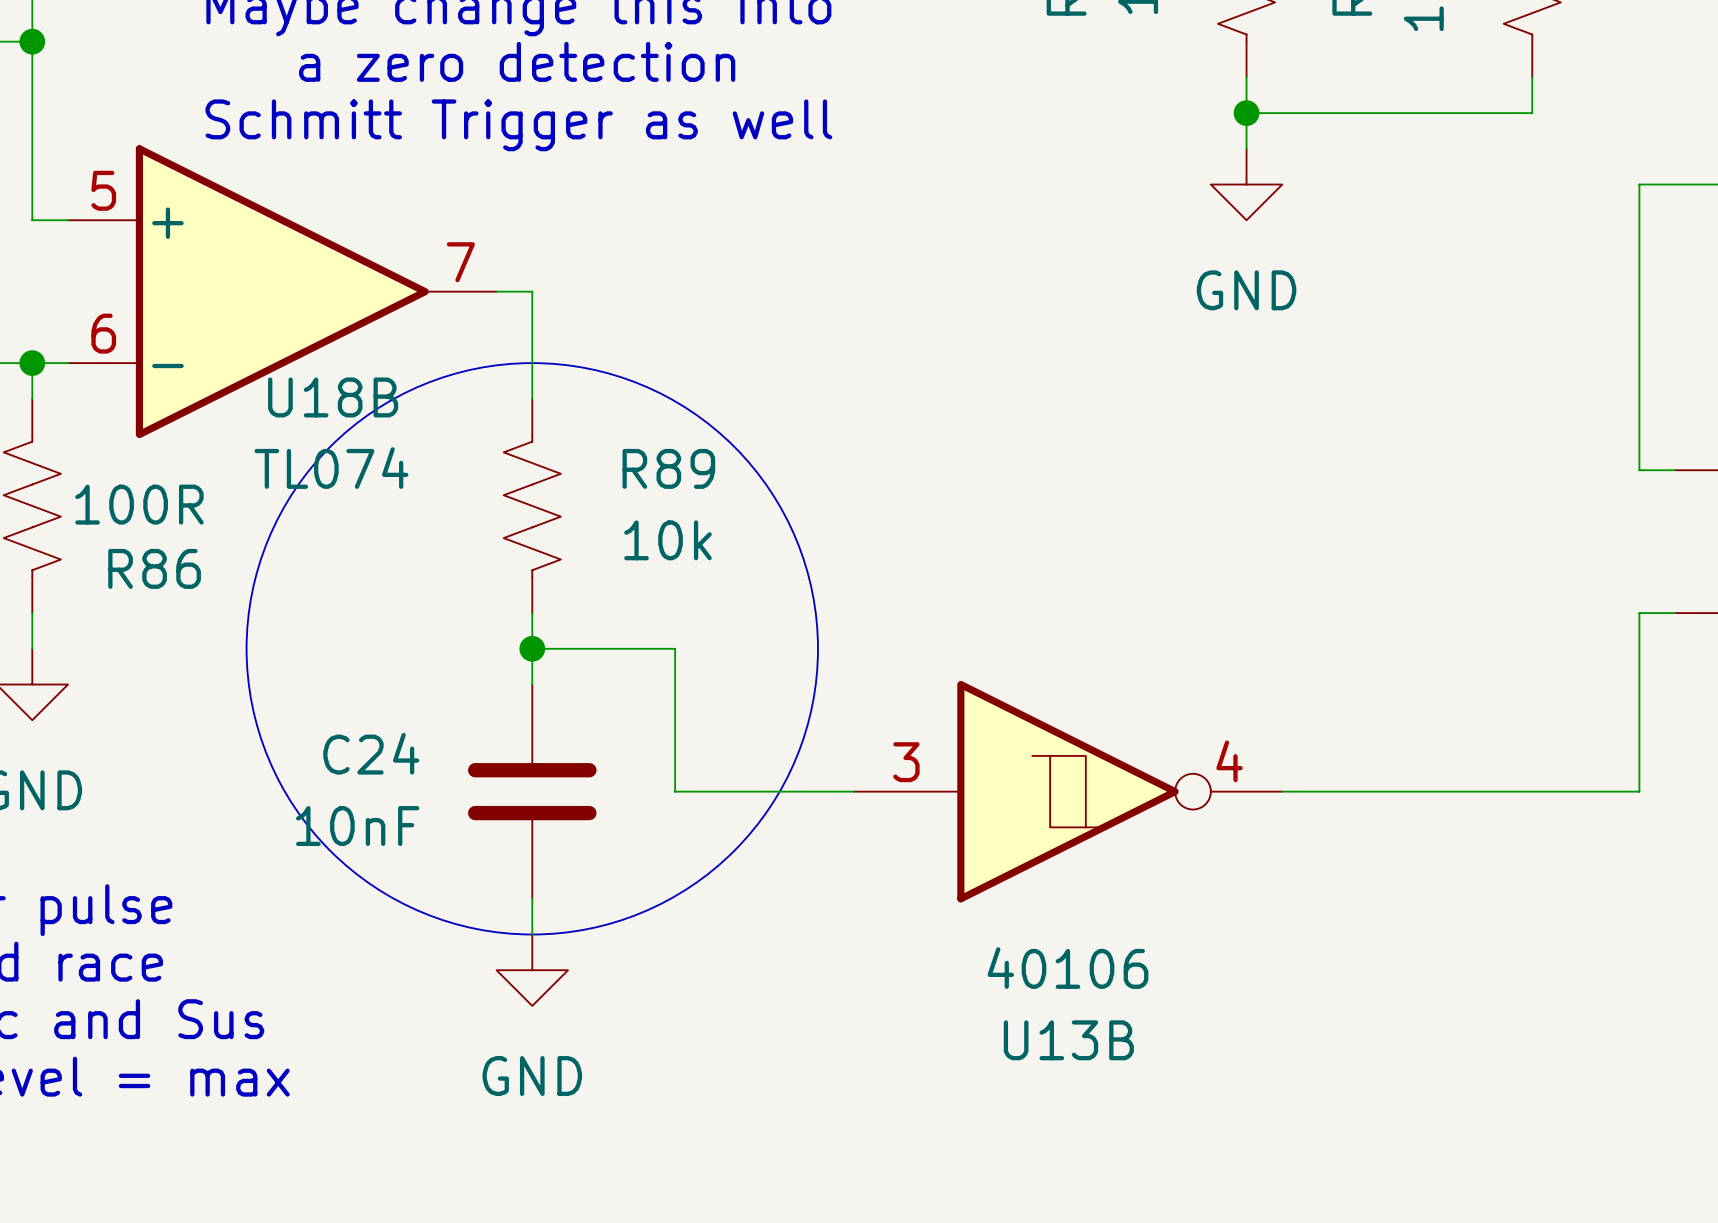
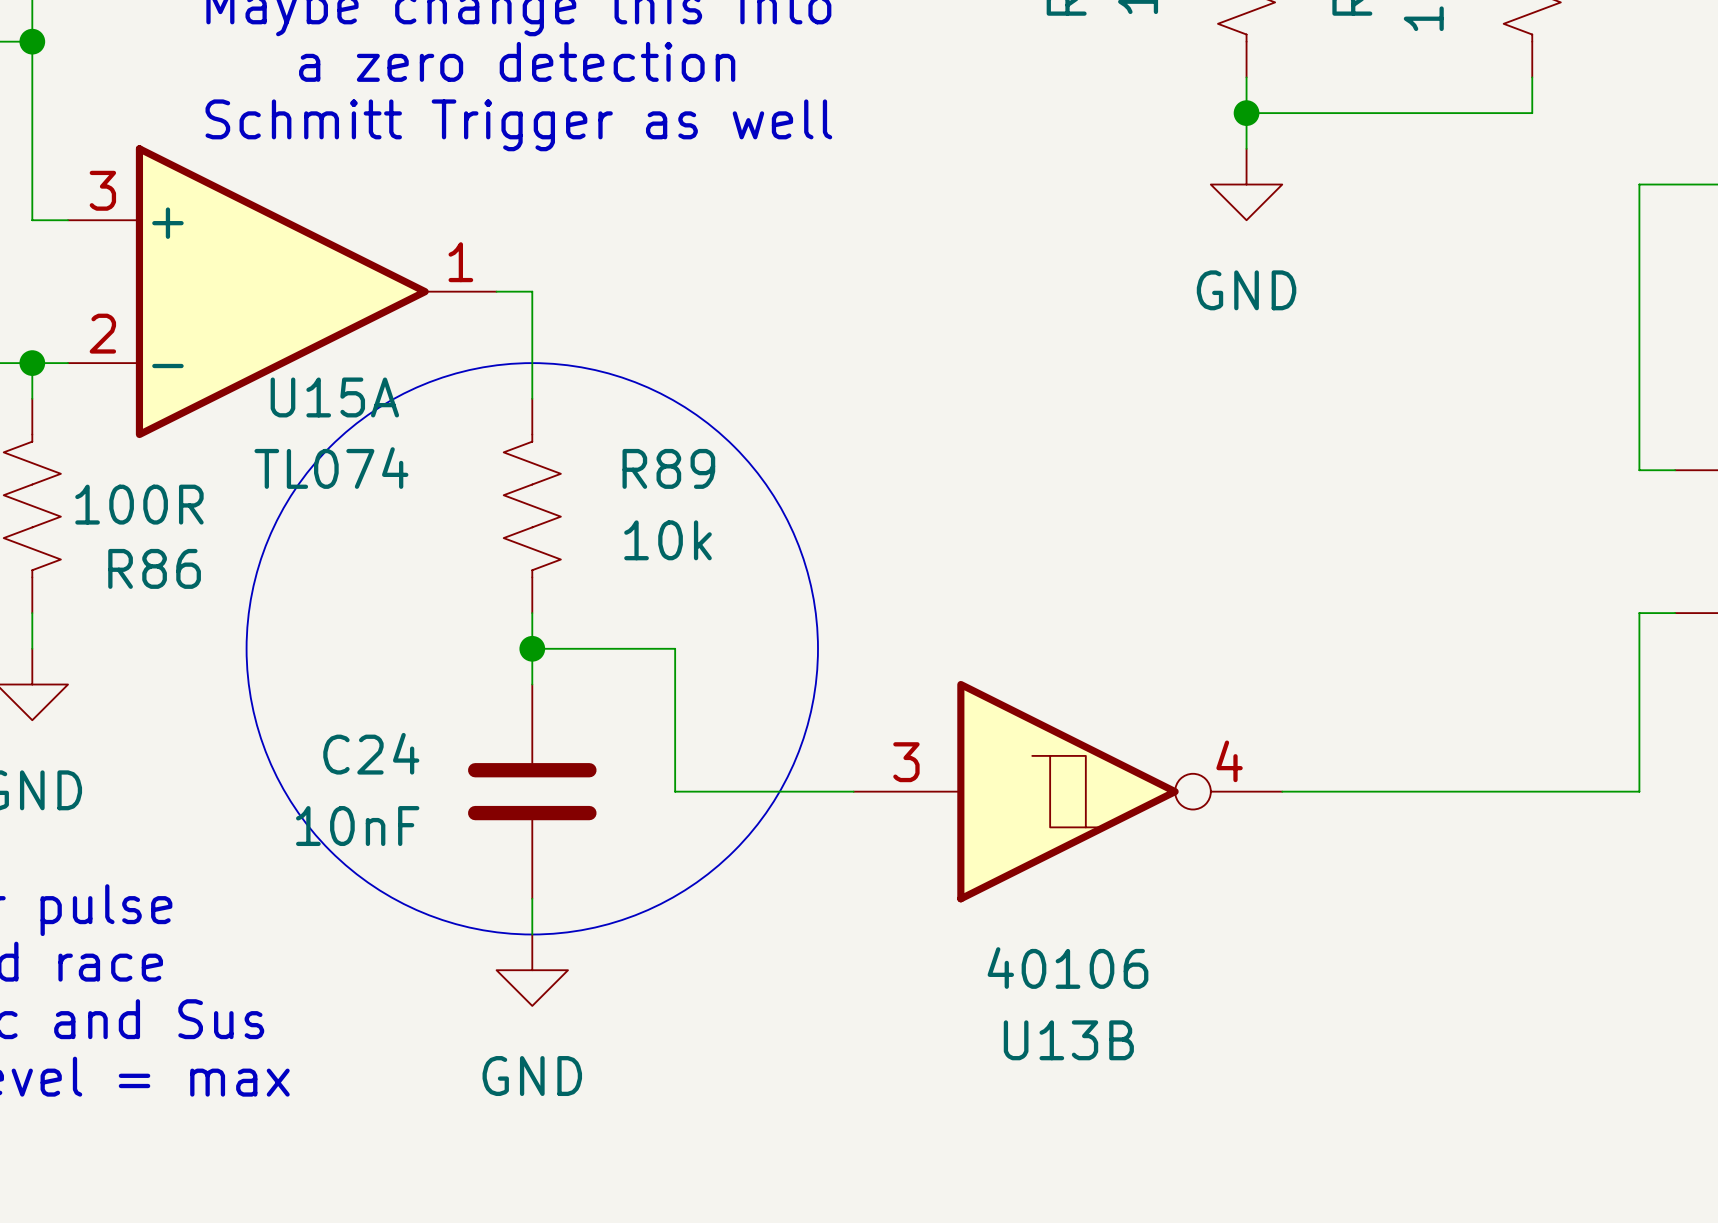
U18B pin number: 5 (103, 190) -> 3 (102, 190)
U18B pin number: 7 (460, 262) -> 1 (460, 262)
U18B pin number: 6 (103, 333) -> 2 (102, 333)
U18B name: U18B (333, 397) -> U15A (334, 397)

